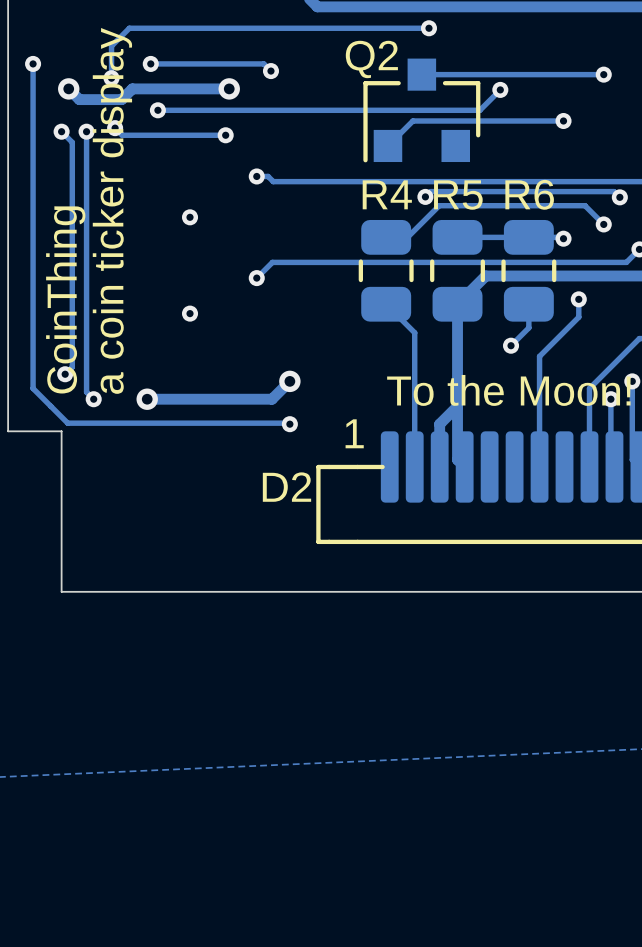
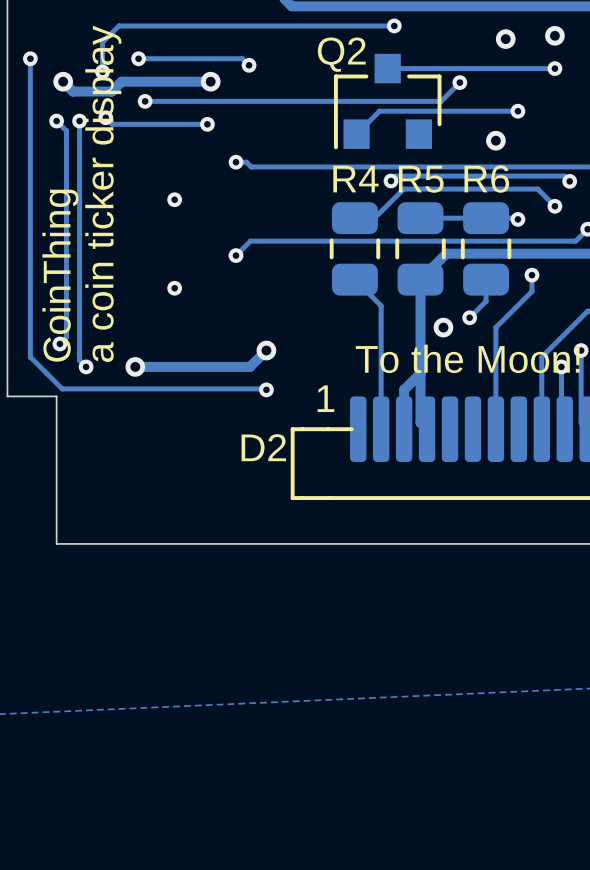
via: none -> (554, 35)
via: none -> (505, 39)
via: none -> (495, 140)
via: none -> (443, 327)

